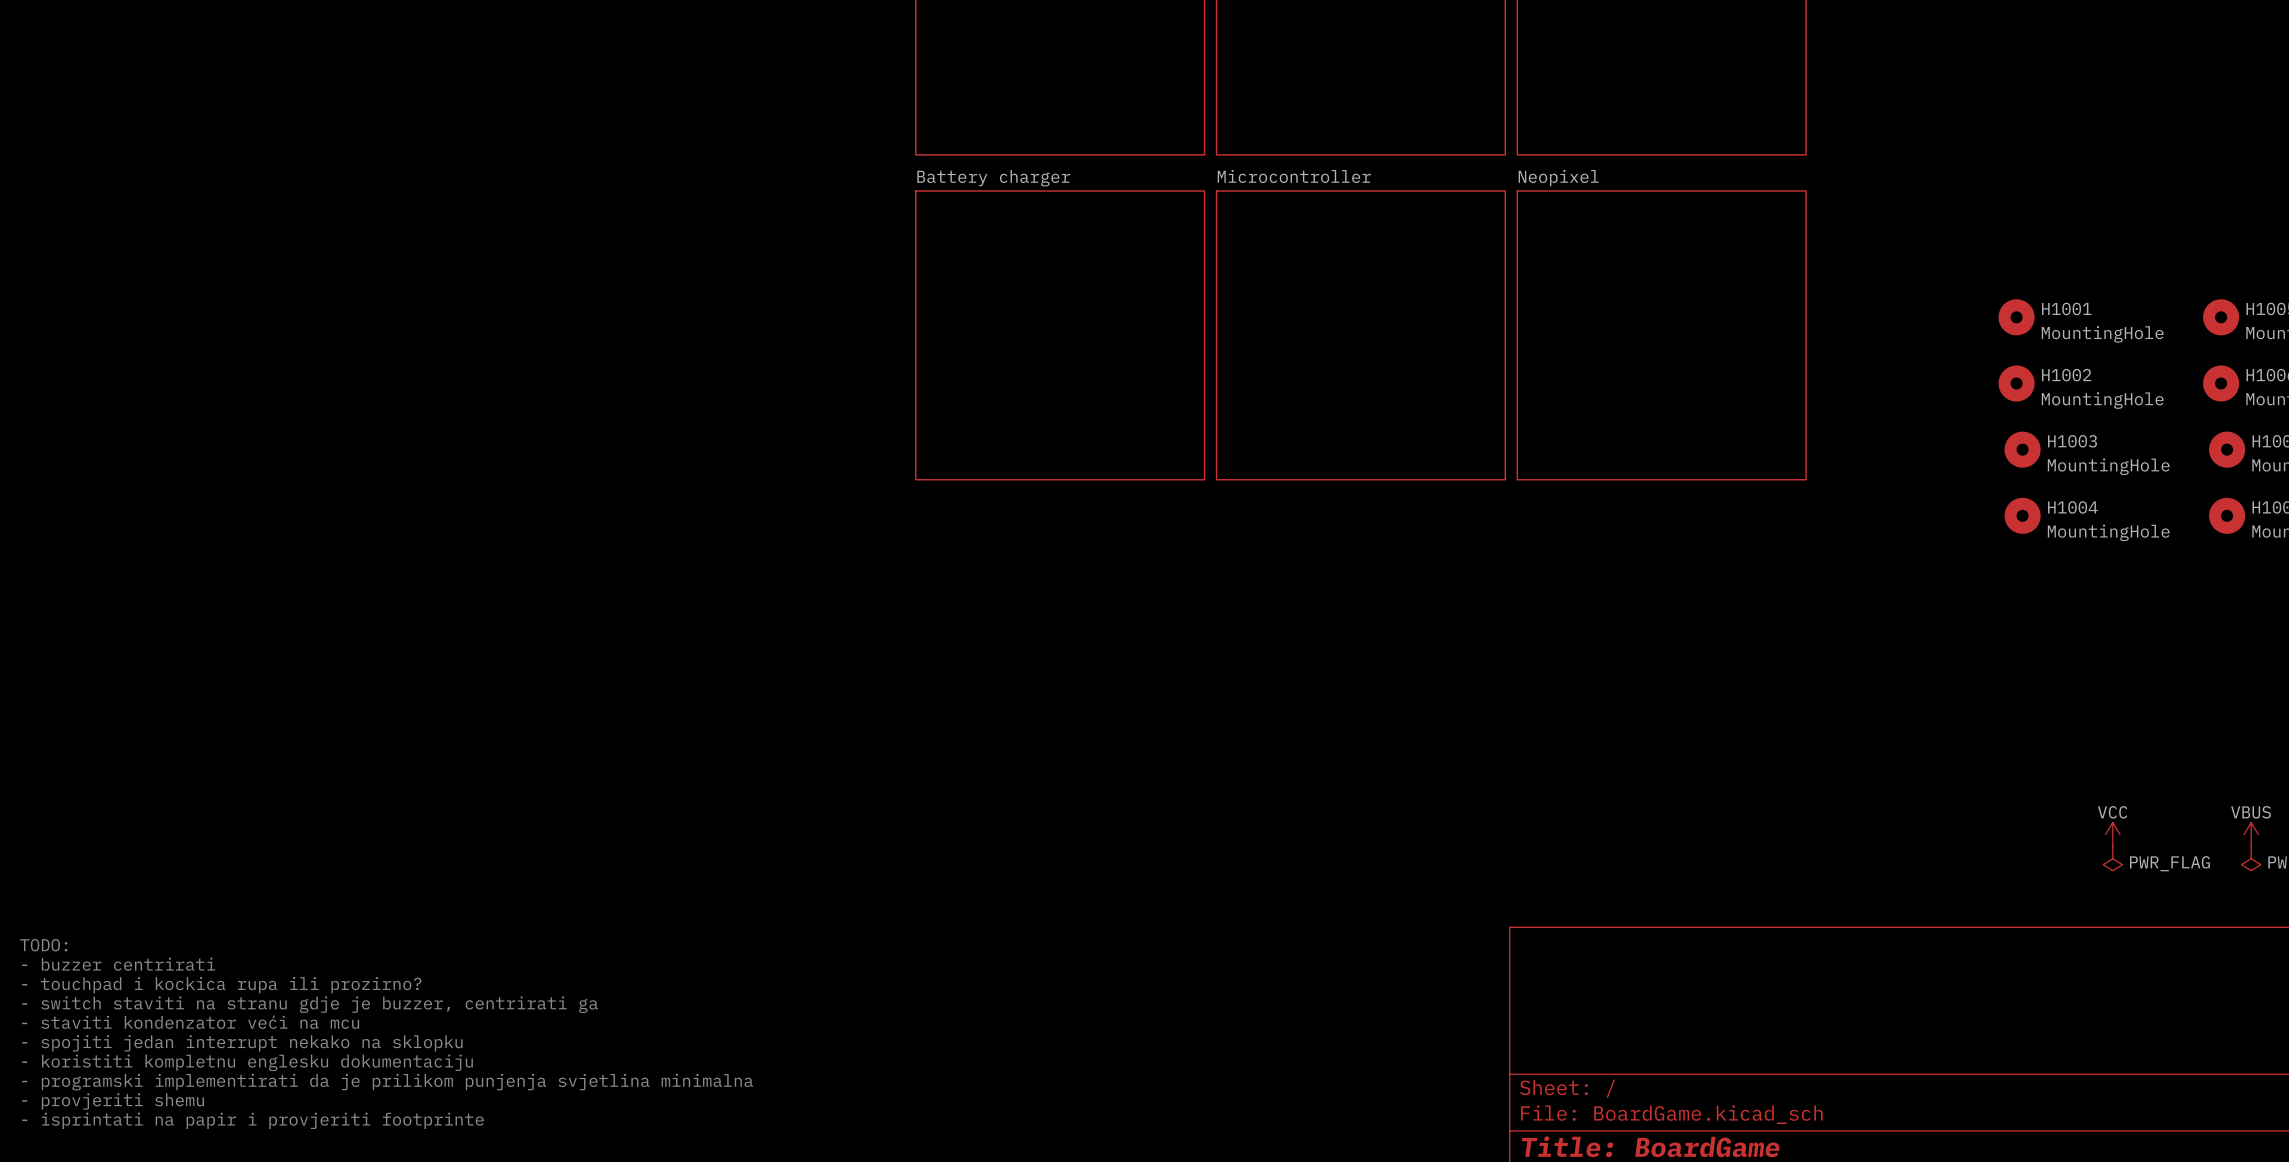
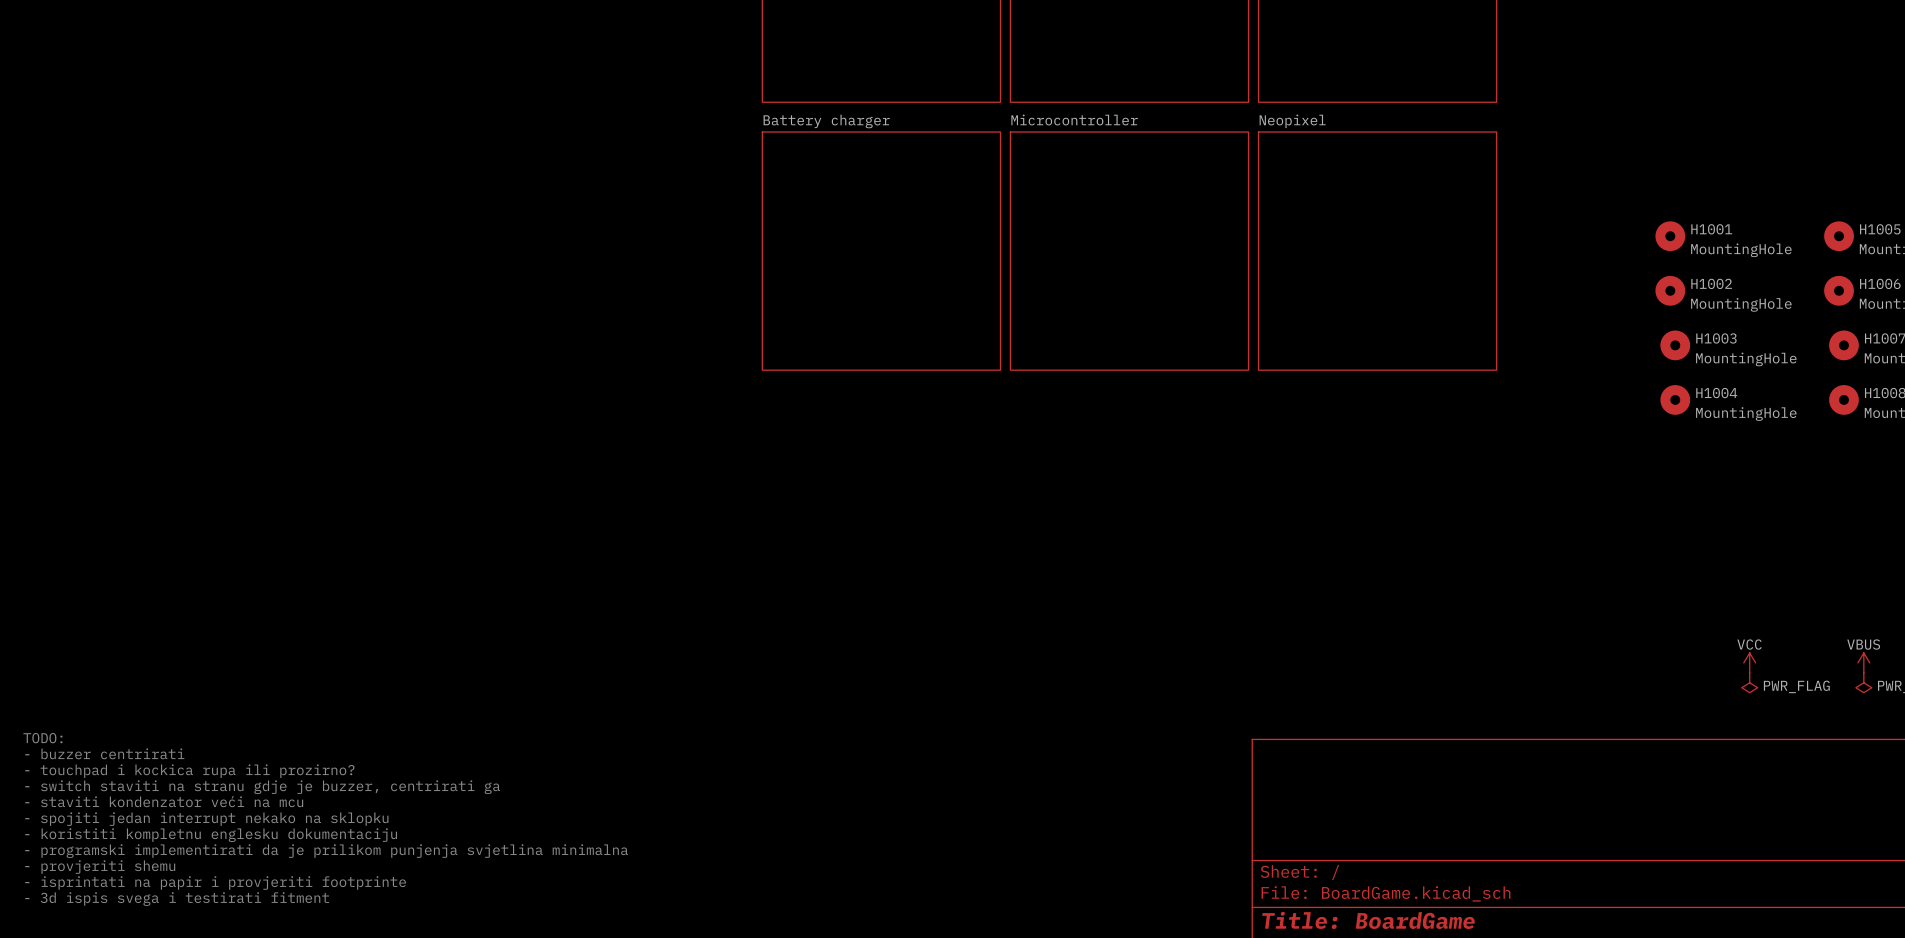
text: none -> TODO: (42, 738)
text: TODO: (43, 945) -> - buzzer centrirati (104, 753)
text: - buzzer centrirati (118, 964) -> - touchpad i kockica rupa ili prozirno? (189, 771)
text: - touchpad i kockica rupa ili prozirno? (221, 985) -> - switch staviti na stranu gdje je buzzer, centrirati ga (262, 787)
text: - switch staviti na stranu gdje je buzzer, centrirati ga (310, 1004) -> - staviti kondenzator veći na mcu (164, 801)
text: - staviti kondenzator veći na mcu (190, 1022) -> - spojiti jedan interrupt nekako na sklopku (206, 819)
text: - spojiti jedan interrupt nekako na sklopku (242, 1043) -> - koristiti kompletnu englesku dokumentaciju (211, 835)
text: - koristiti kompletnu englesku dokumentaciju (247, 1062) -> - programski implementirati da je prilikom punjenja svjetlina minimalna (326, 851)
text: - programski implementirati da je prilikom punjenja svjetlina minimalna (387, 1082) -> - provjeriti shemu (100, 867)
text: - provjeriti shemu (113, 1101) -> - isprintati na papir i provjeriti footprinte (215, 883)
text: - isprintati na papir i provjeriti footprinte (252, 1120) -> - 3d ispis svega i testirati fitment (177, 899)

